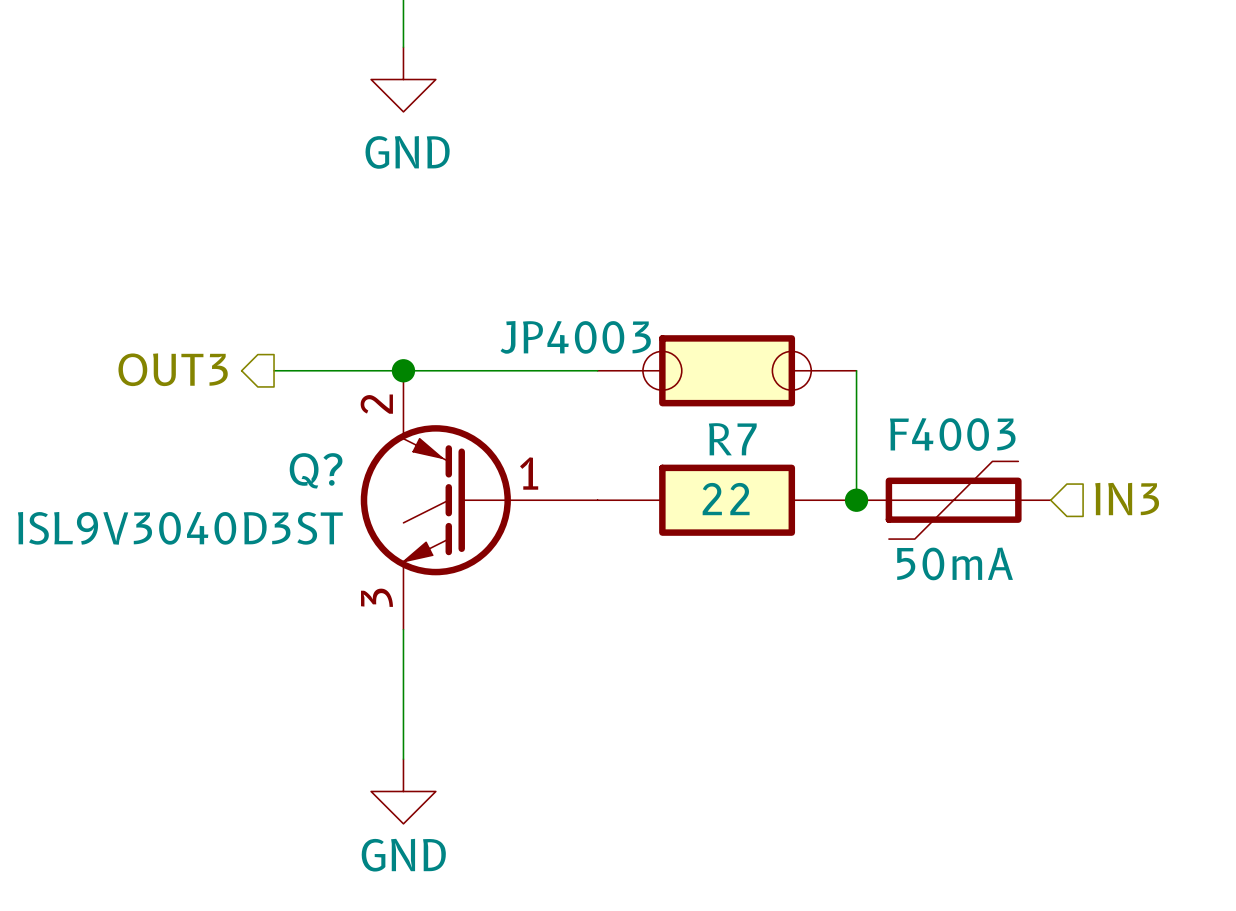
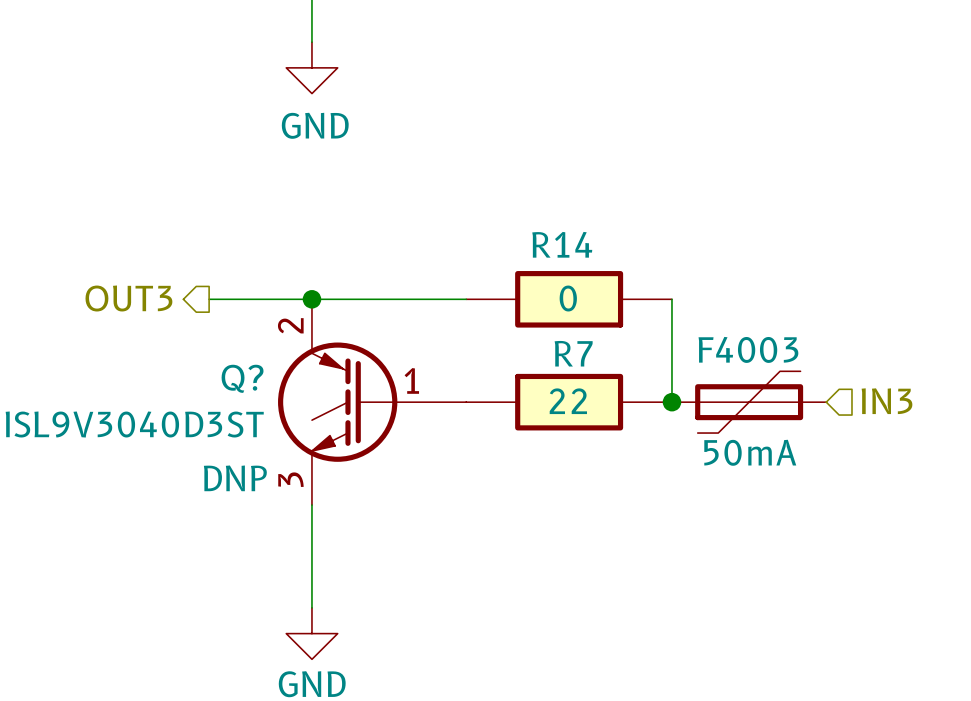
JP4003: (727, 370) -> none
R14: none -> 0 (569, 299)
Q? text: none -> DNP (235, 478)

